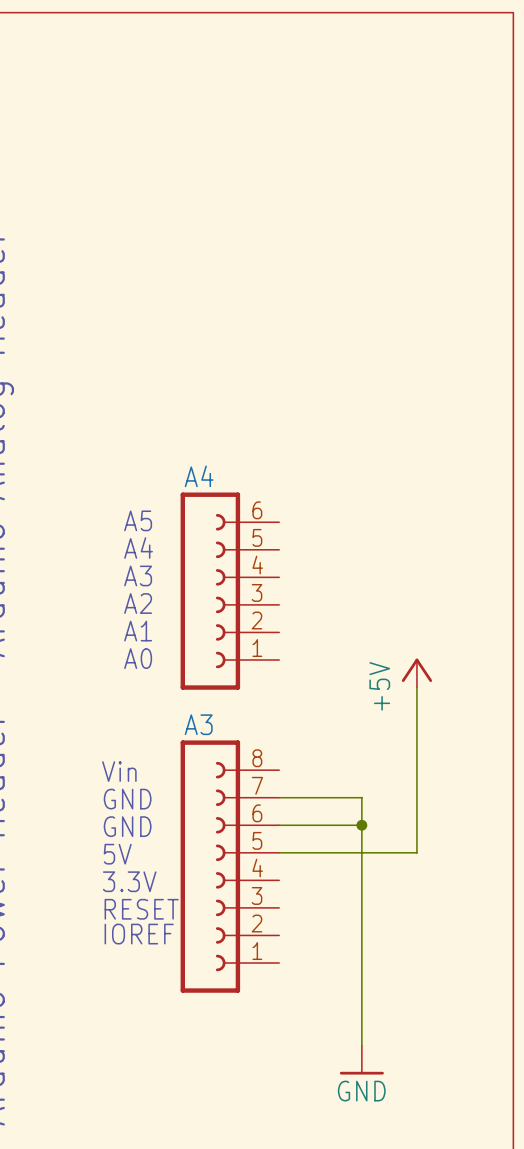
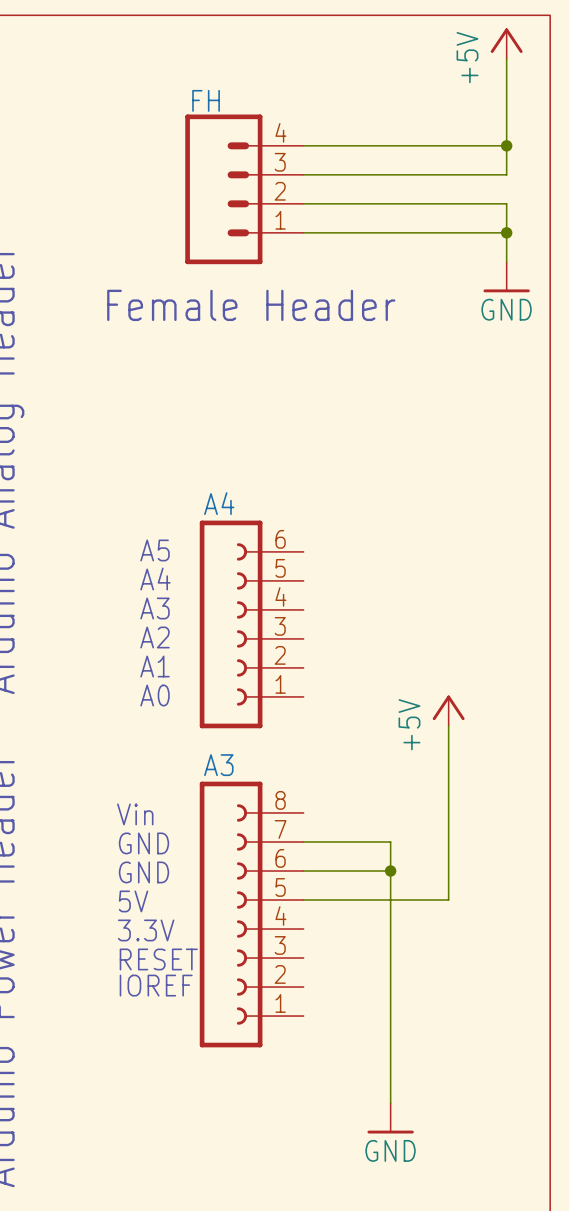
power symbol: none -> +5V (506, 43)
wire: none -> (506, 58) (506, 174) (303, 174)
wire: none -> (303, 145) (506, 145)
junction: none -> (506, 145)
FH: none -> (244, 189)
wire: none -> (303, 203) (506, 203) (506, 261)
wire: none -> (303, 232) (506, 232)
junction: none -> (506, 232)
power symbol: none -> GND (506, 277)
text: none -> Female Header (251, 305)

